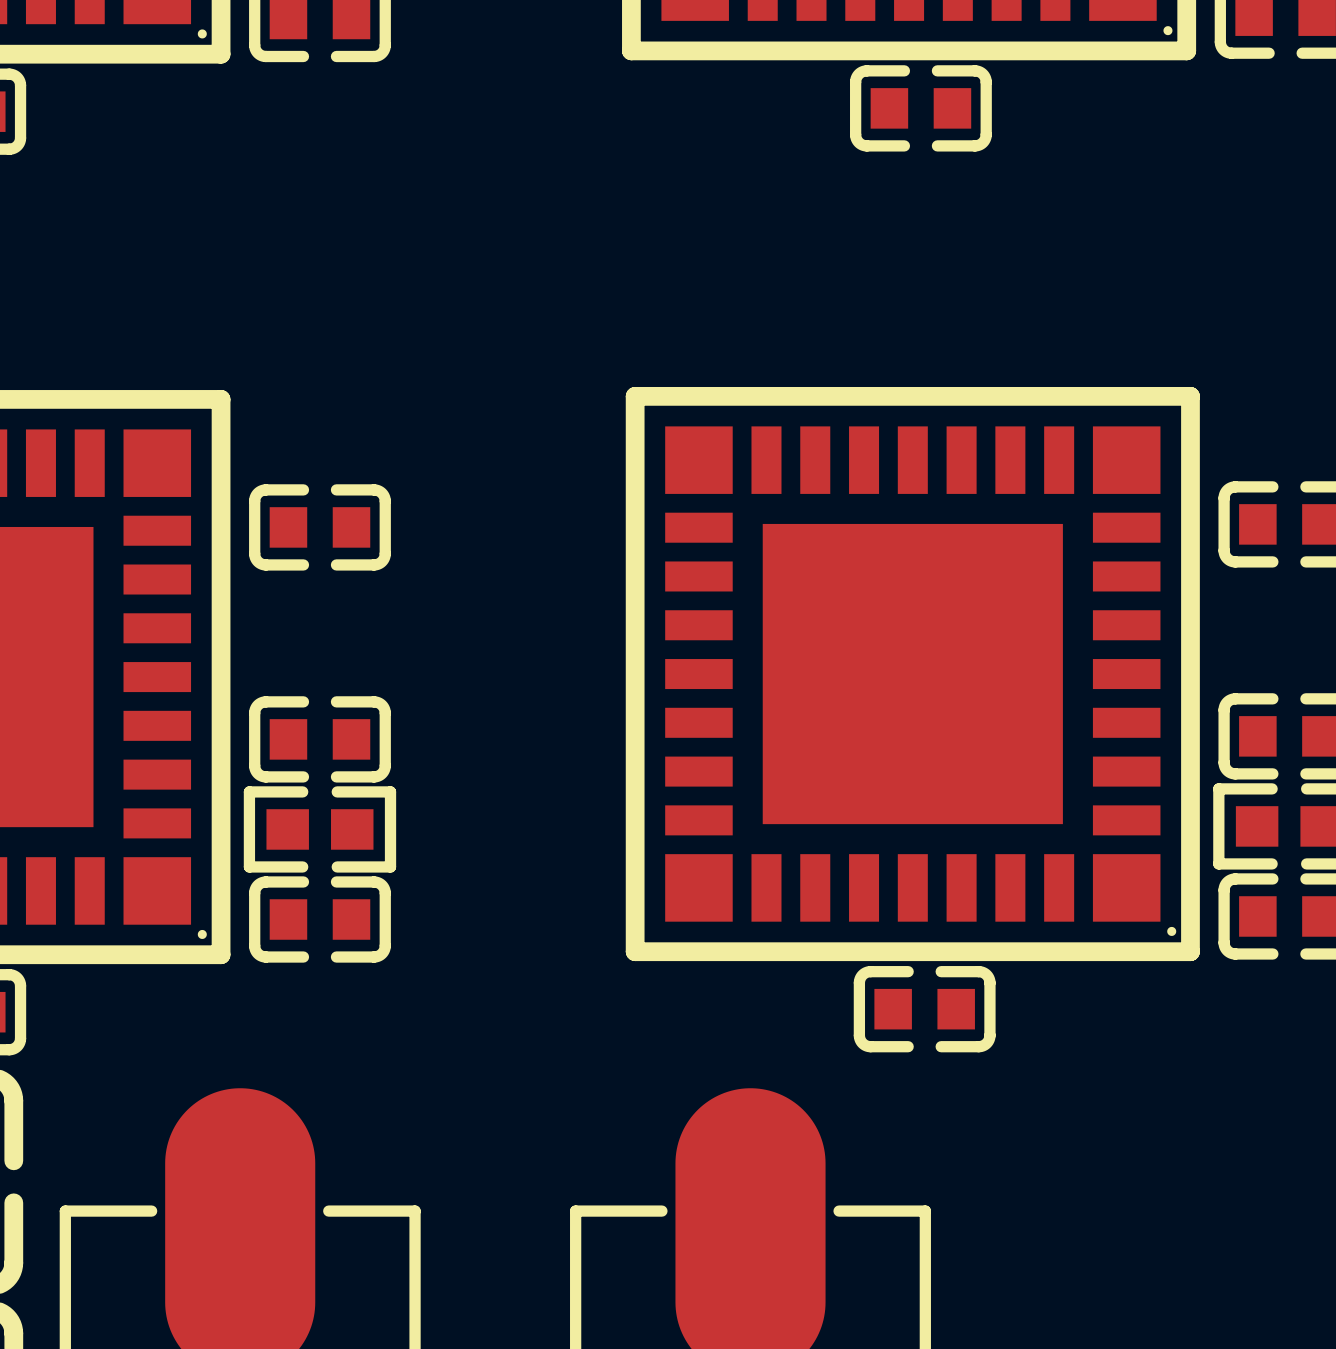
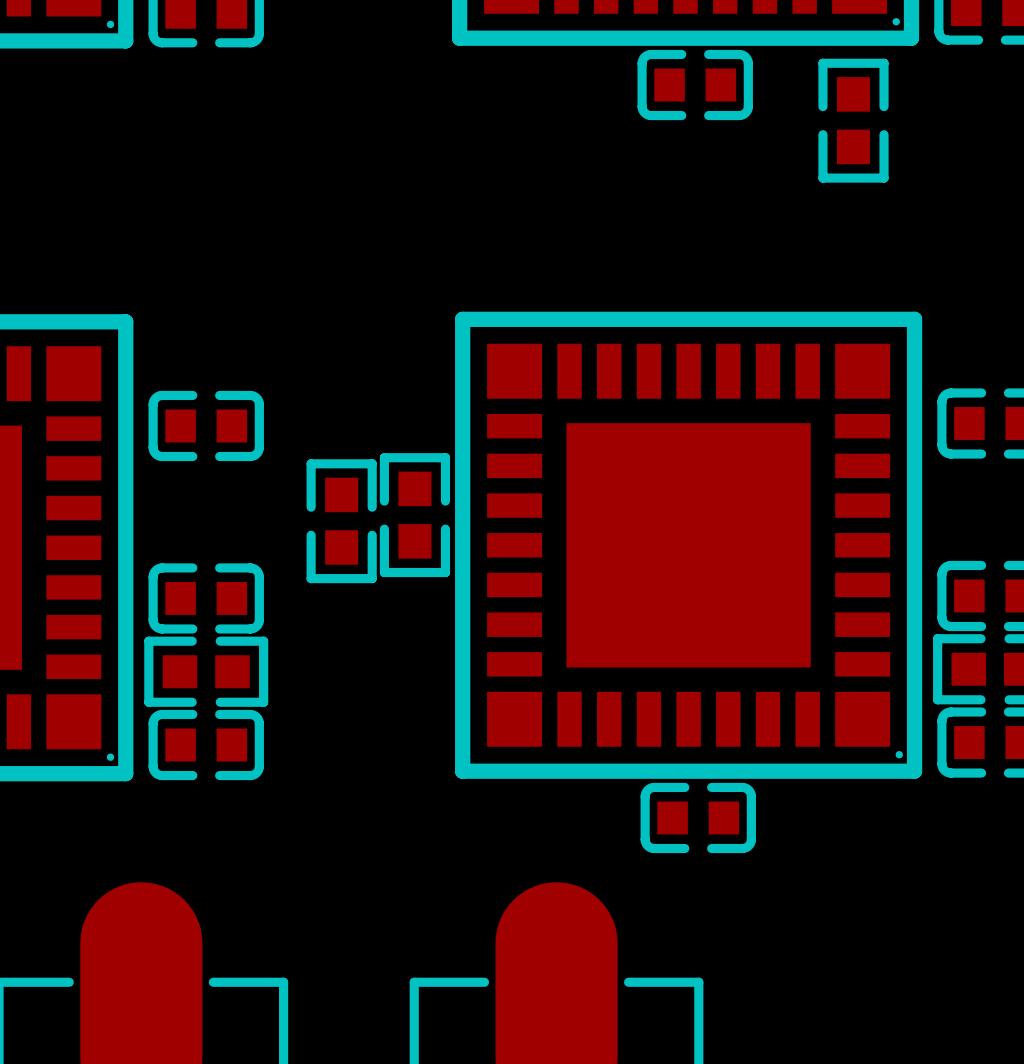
part: none -> (853, 120)
part: none -> (414, 515)
part: none -> (341, 521)

